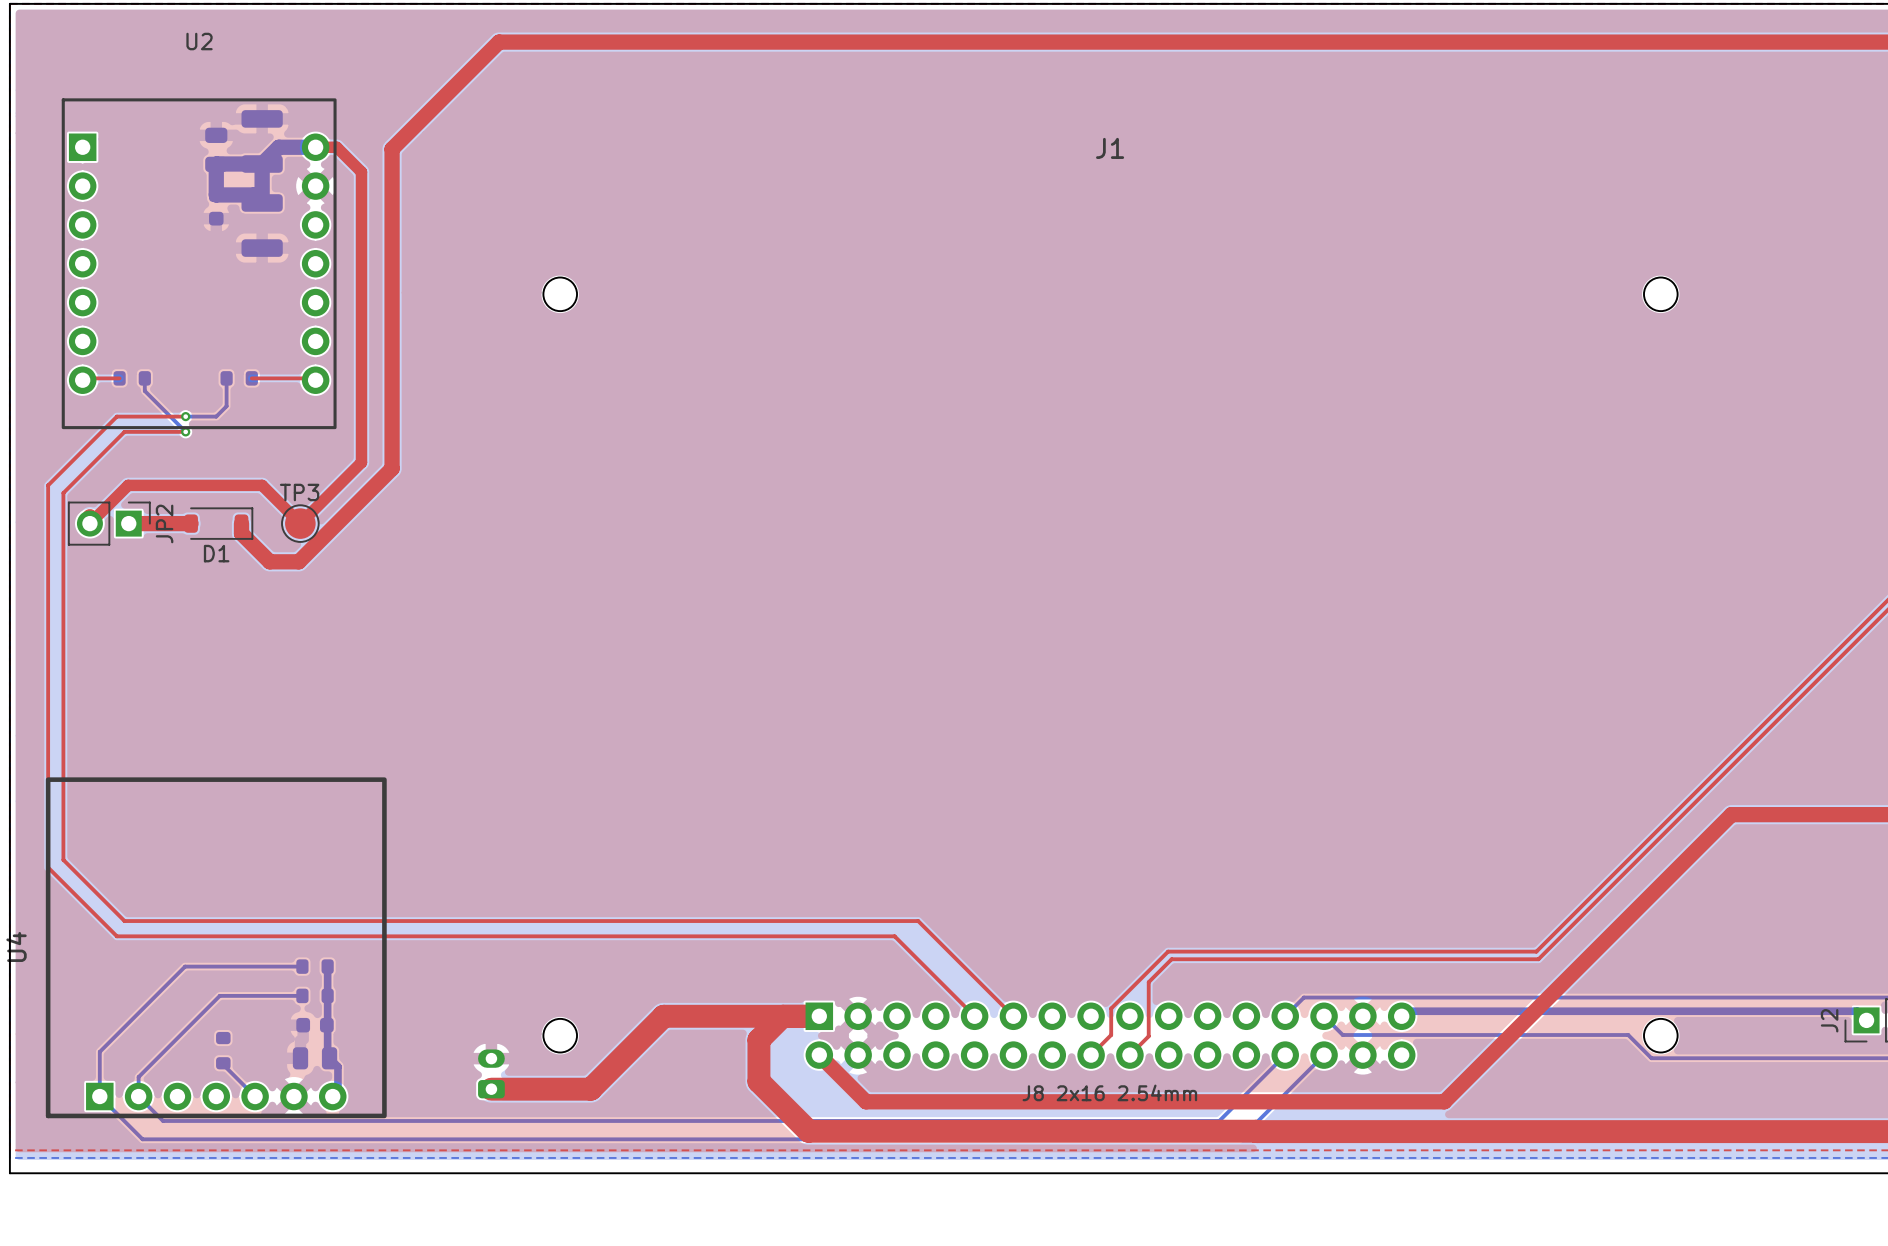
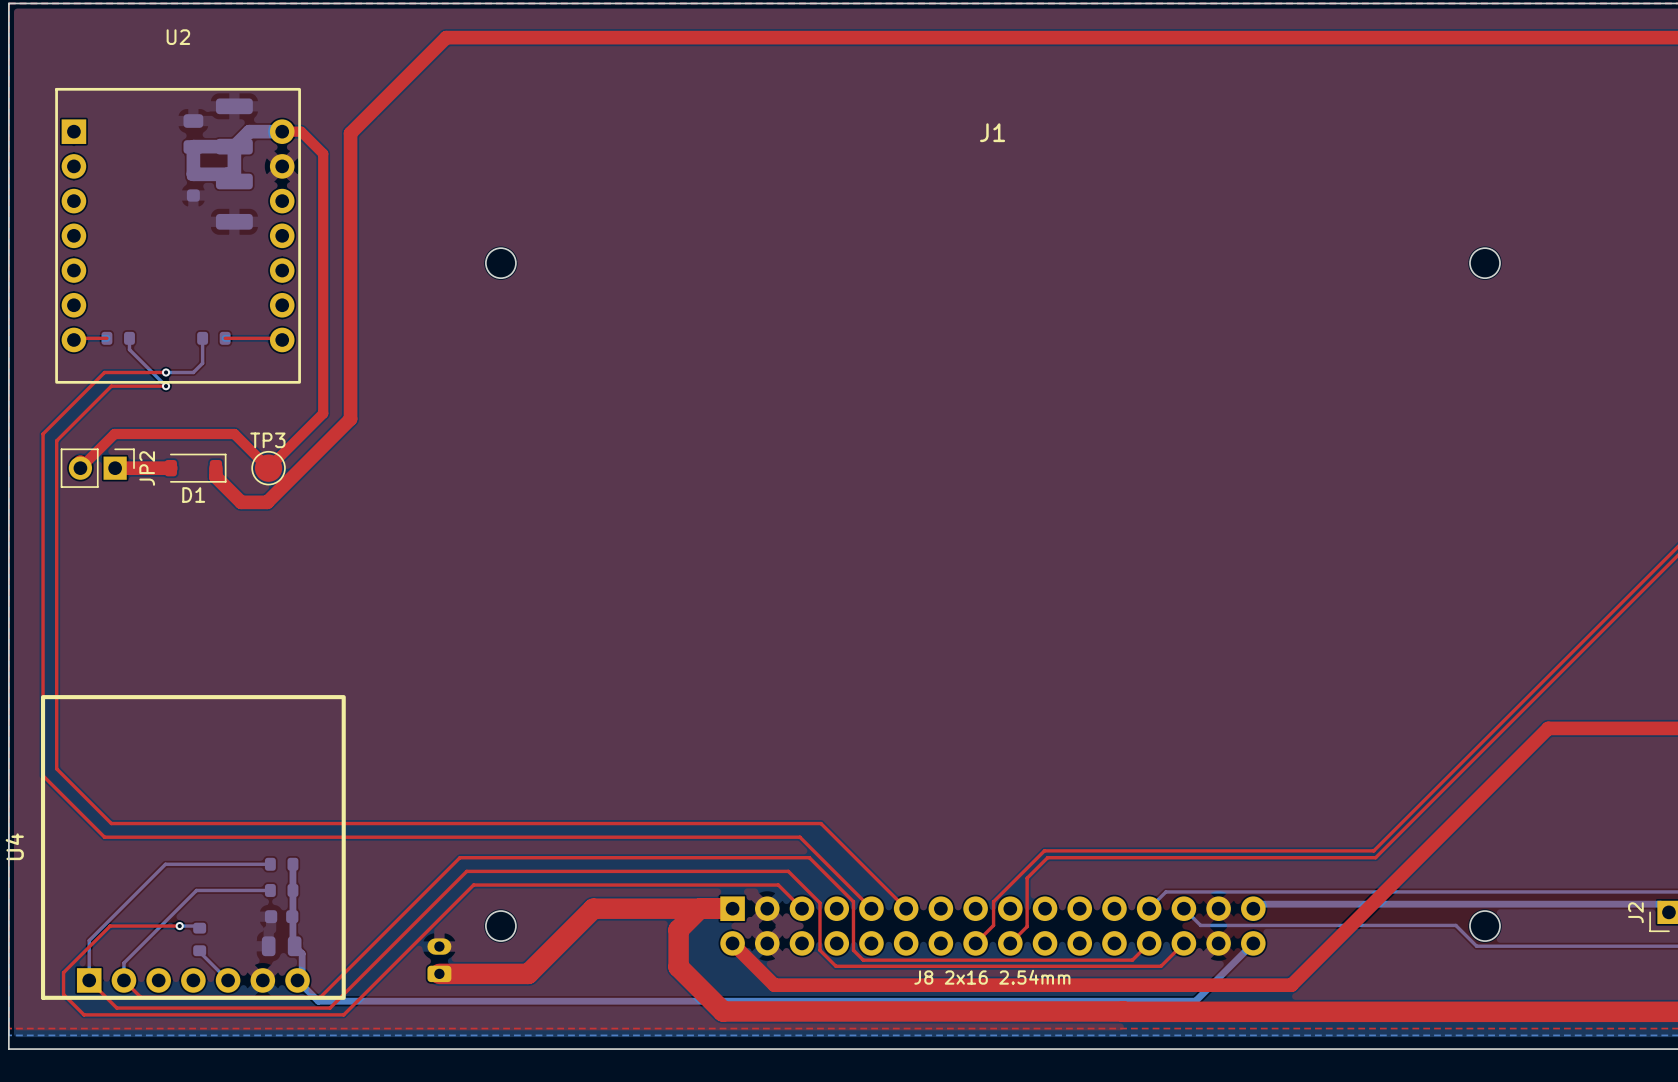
top track: none -> (802, 908) (778, 885) (473, 885) (343, 1014) (84, 1014) (63, 994) (63, 972) (110, 926) (179, 926)
bottom track: none -> (179, 926) (197, 926) (199, 928)
via: none -> (179, 926)
top track: none -> (1149, 943) (1132, 960) (863, 960) (853, 950) (853, 901) (809, 857) (459, 857) (320, 997) (140, 997) (123, 980)
bottom track: (1285, 1055) (1219, 1120) (163, 1120) (138, 1096) -> none
top track: none -> (1183, 943) (1161, 966) (835, 966) (819, 950) (819, 902) (788, 871) (466, 871) (330, 1008) (116, 1008) (89, 980)
bottom track: (1324, 1055) (1239, 1139) (142, 1139) (99, 1096) -> none
bottom track: none -> (1252, 946) (1253, 943) (1195, 1001) (318, 1001) (297, 980)

